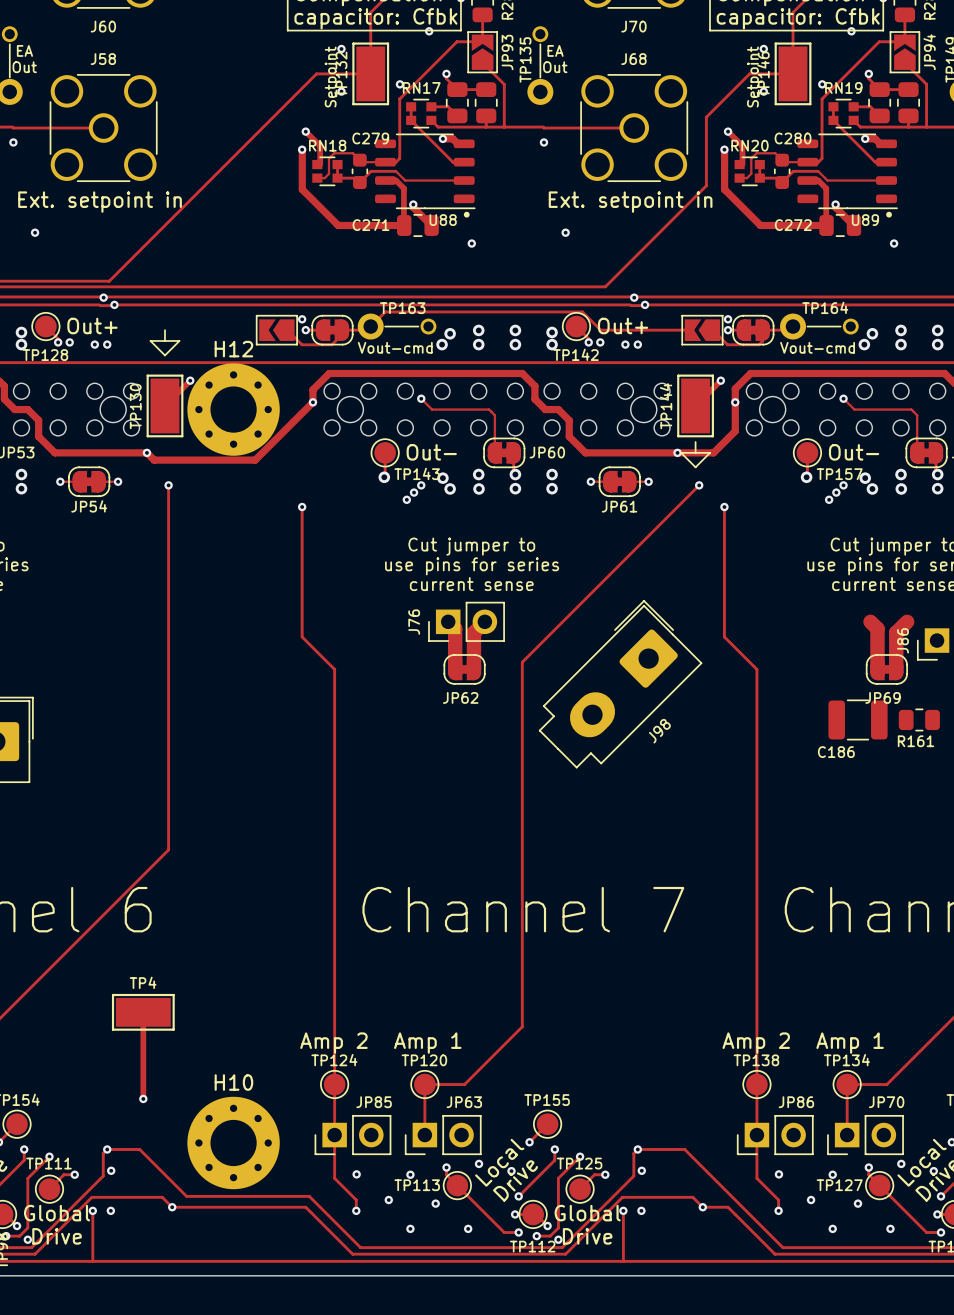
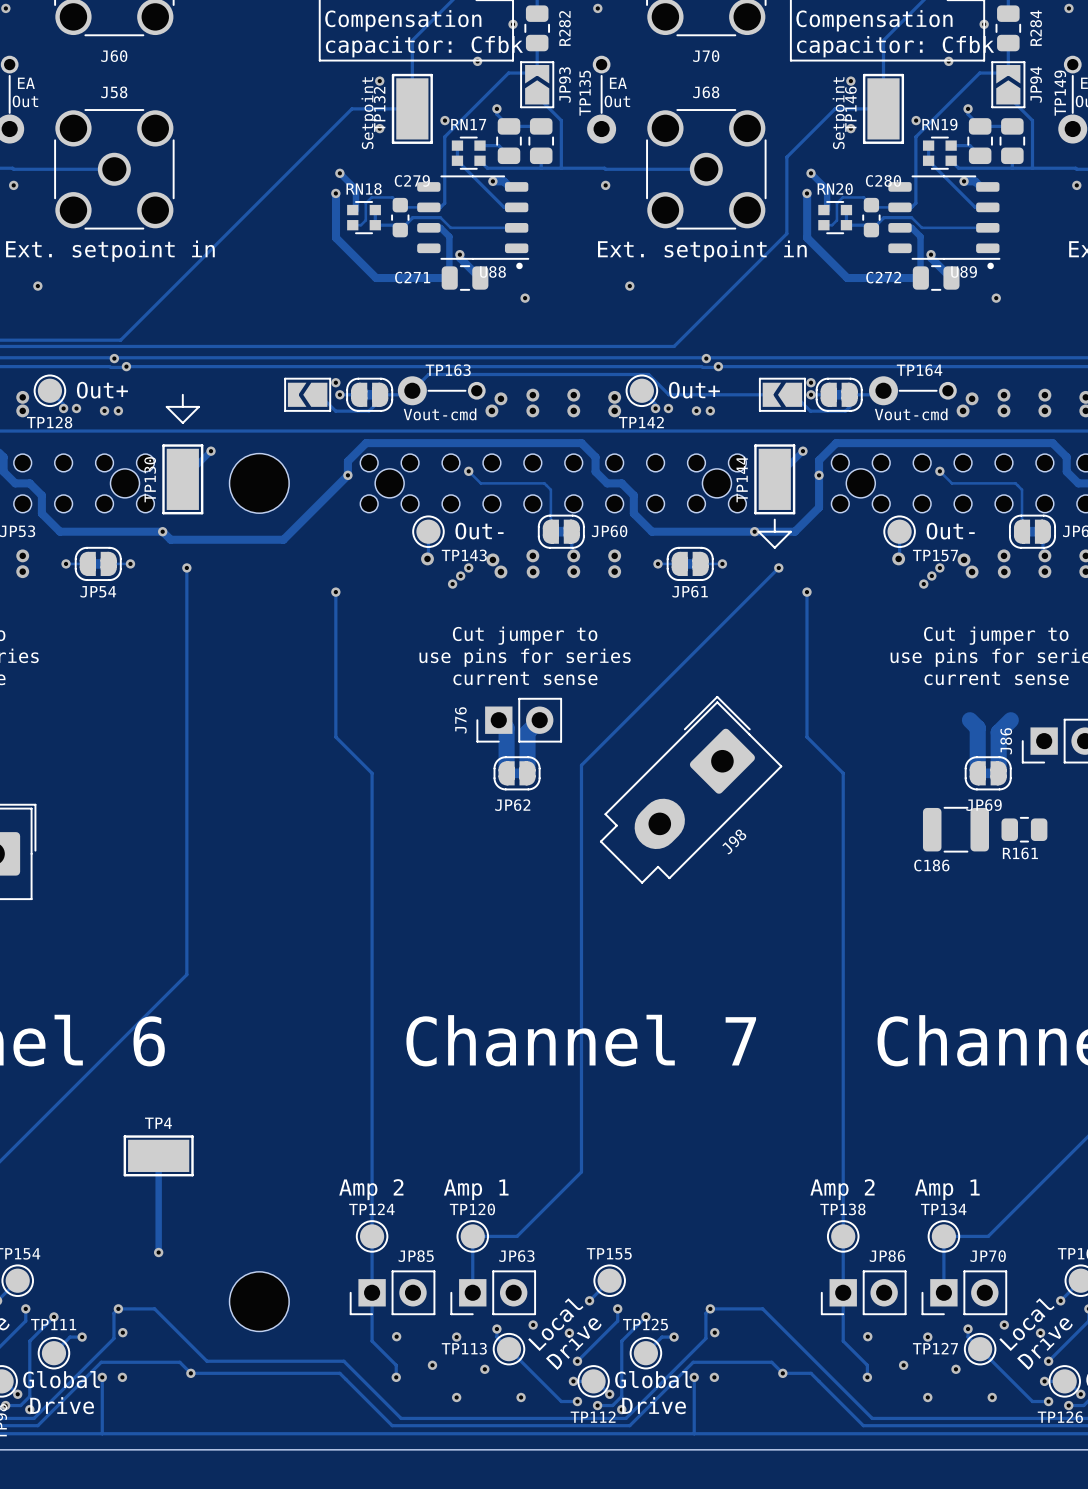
H12: (233, 409) -> none
part: none -> (259, 483)
H10: (233, 1142) -> none
part: none -> (259, 1301)

